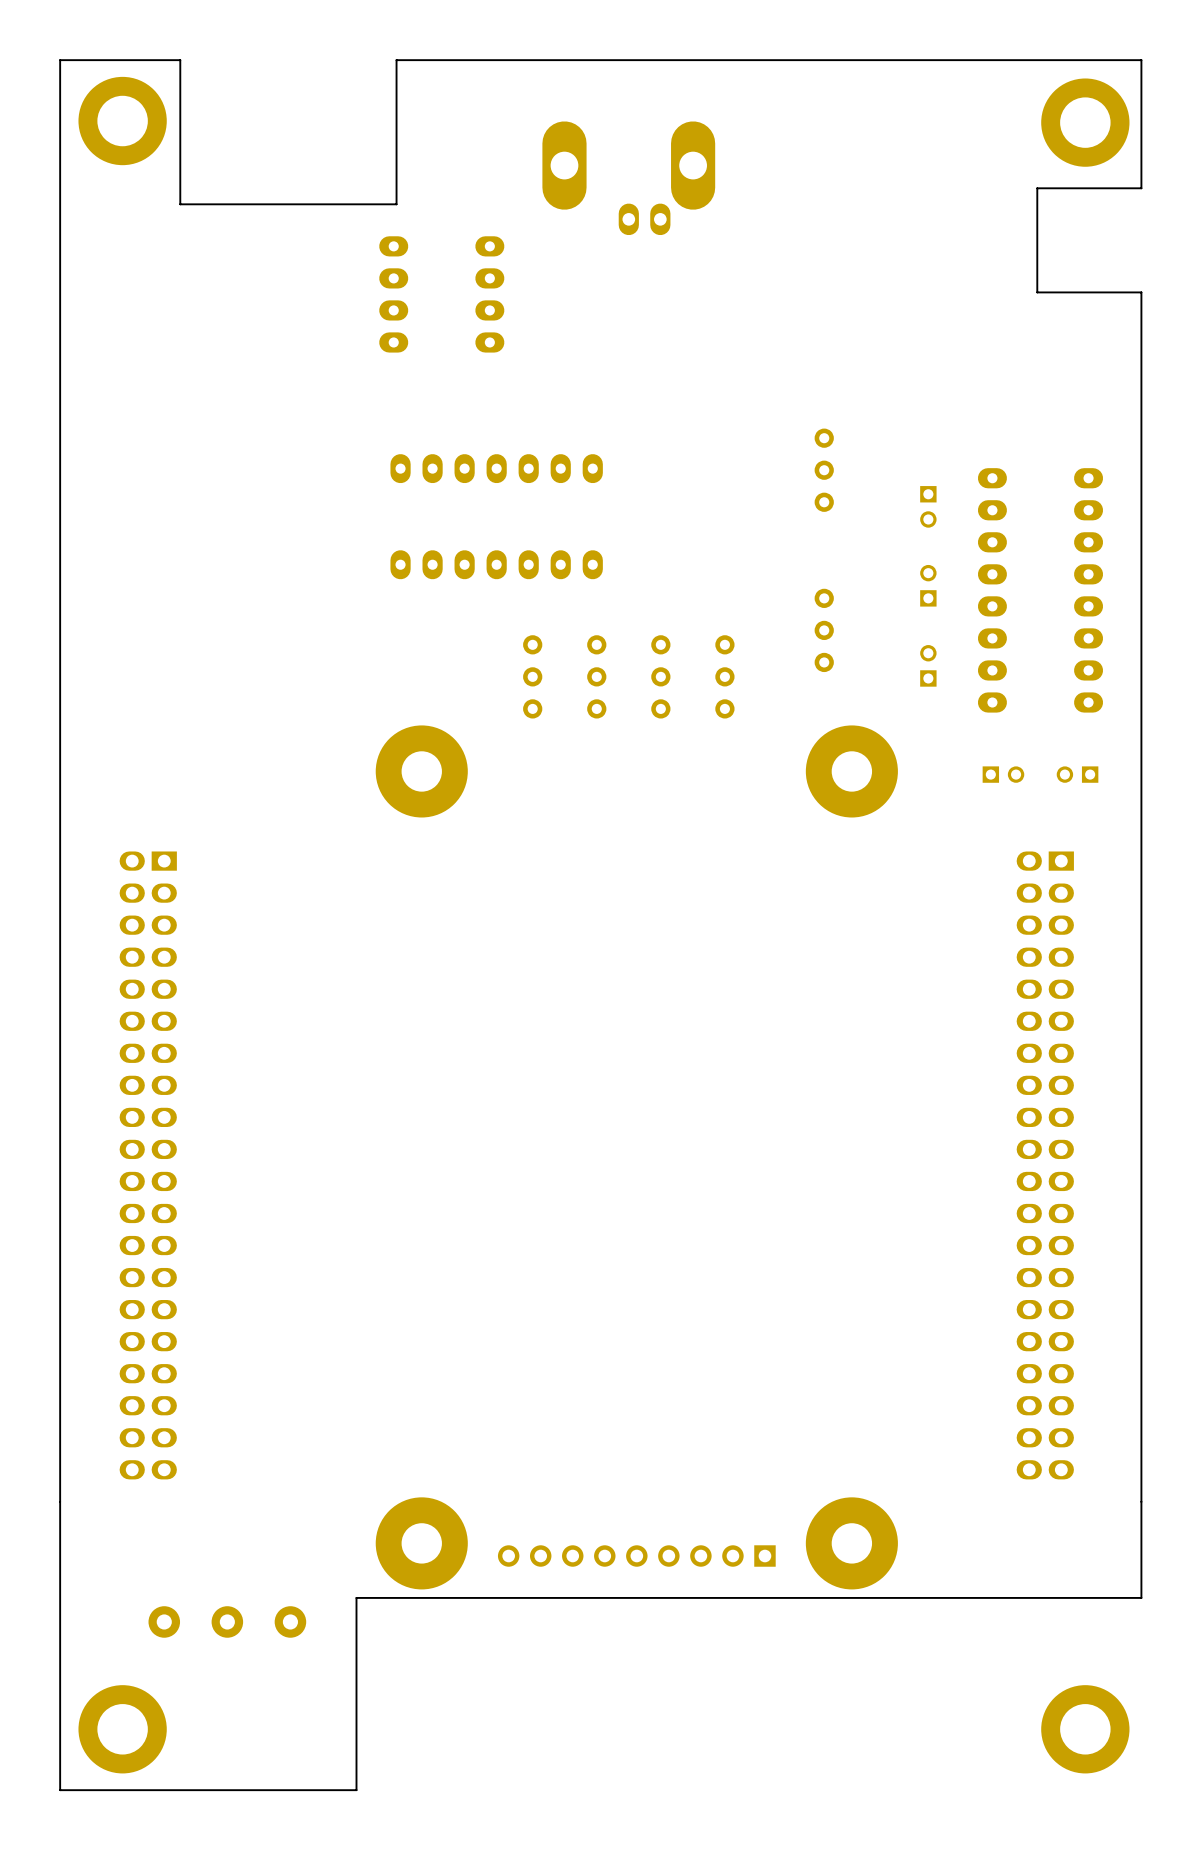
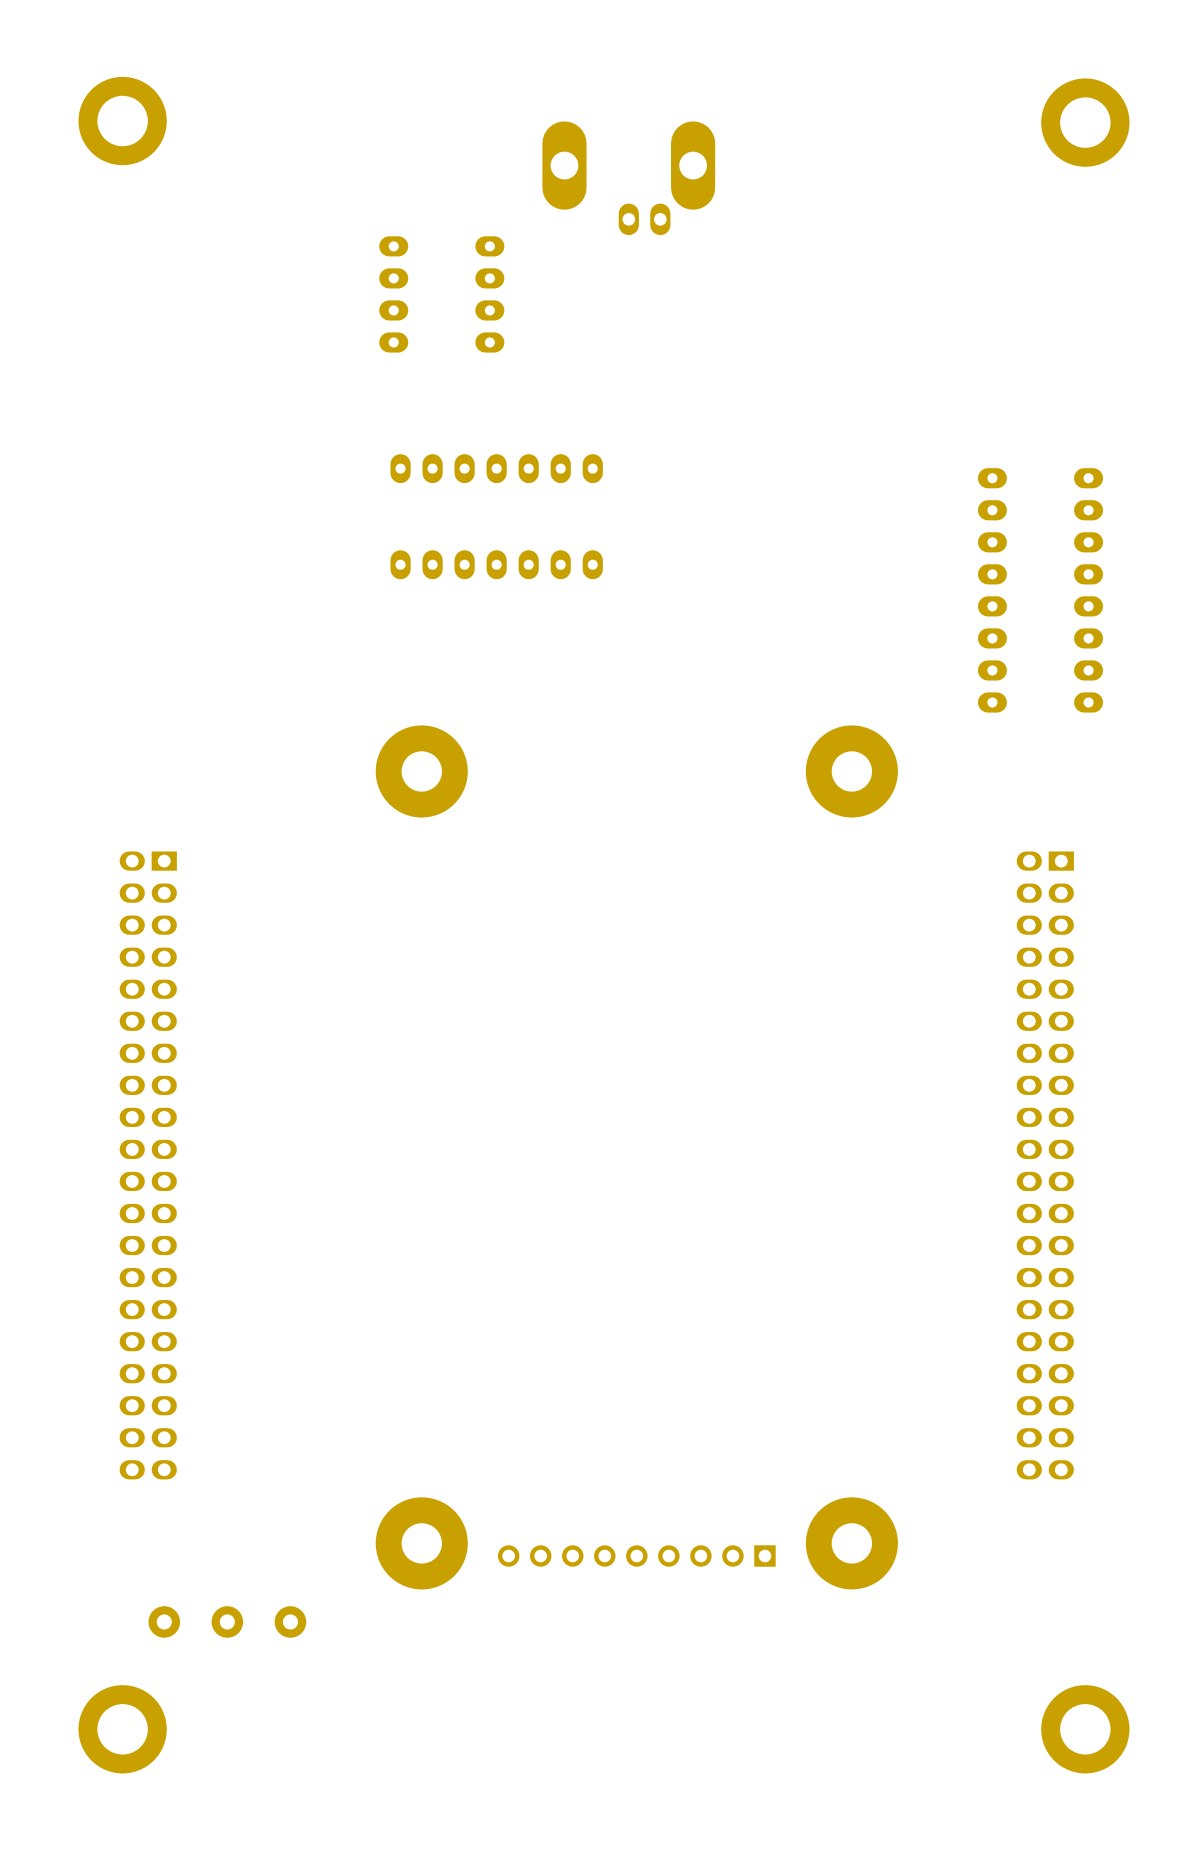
board edge: (1141, 60) (396, 60) (396, 204) (180, 204) (180, 60) (60, 60) (60, 1790) (356, 1790) (356, 1597) (1141, 1597) (1141, 292) (1037, 292) (1037, 188) (1141, 188) (1141, 60) -> none
part: (824, 470) -> none
part: (928, 506) -> none
part: (928, 585) -> none
part: (824, 630) -> none
part: (928, 665) -> none
part: (532, 676) -> none
part: (596, 676) -> none
part: (660, 676) -> none
part: (724, 676) -> none
part: (1003, 774) -> none
part: (1077, 774) -> none

